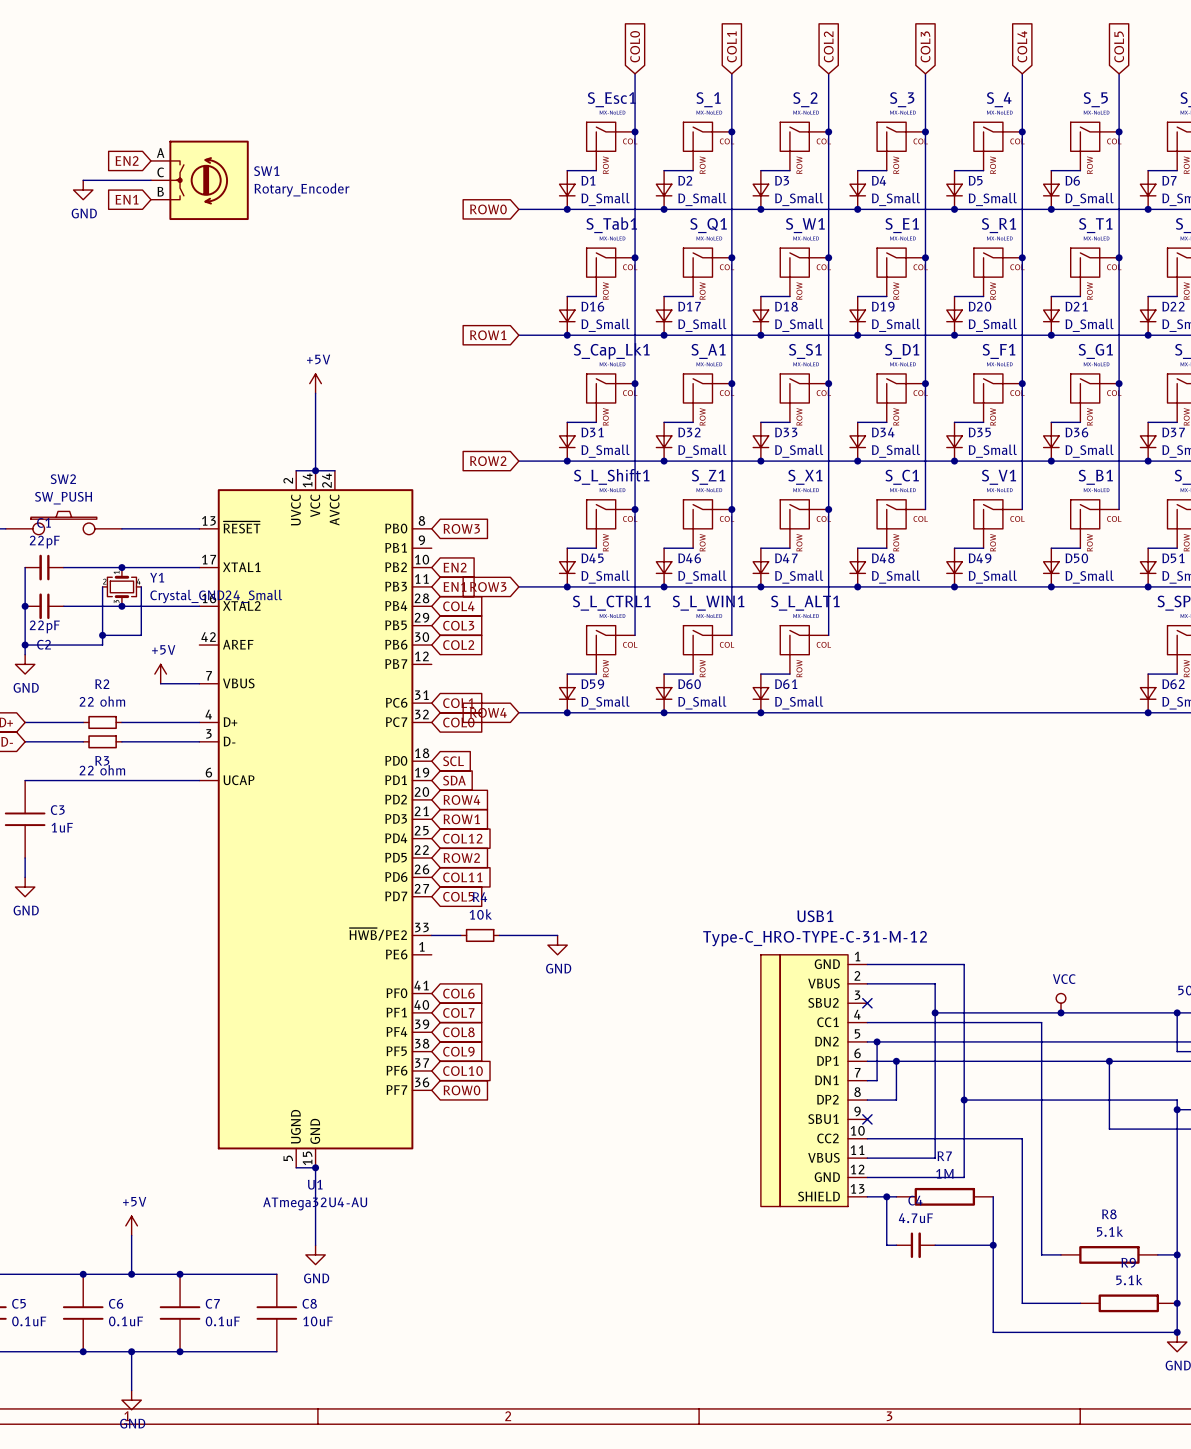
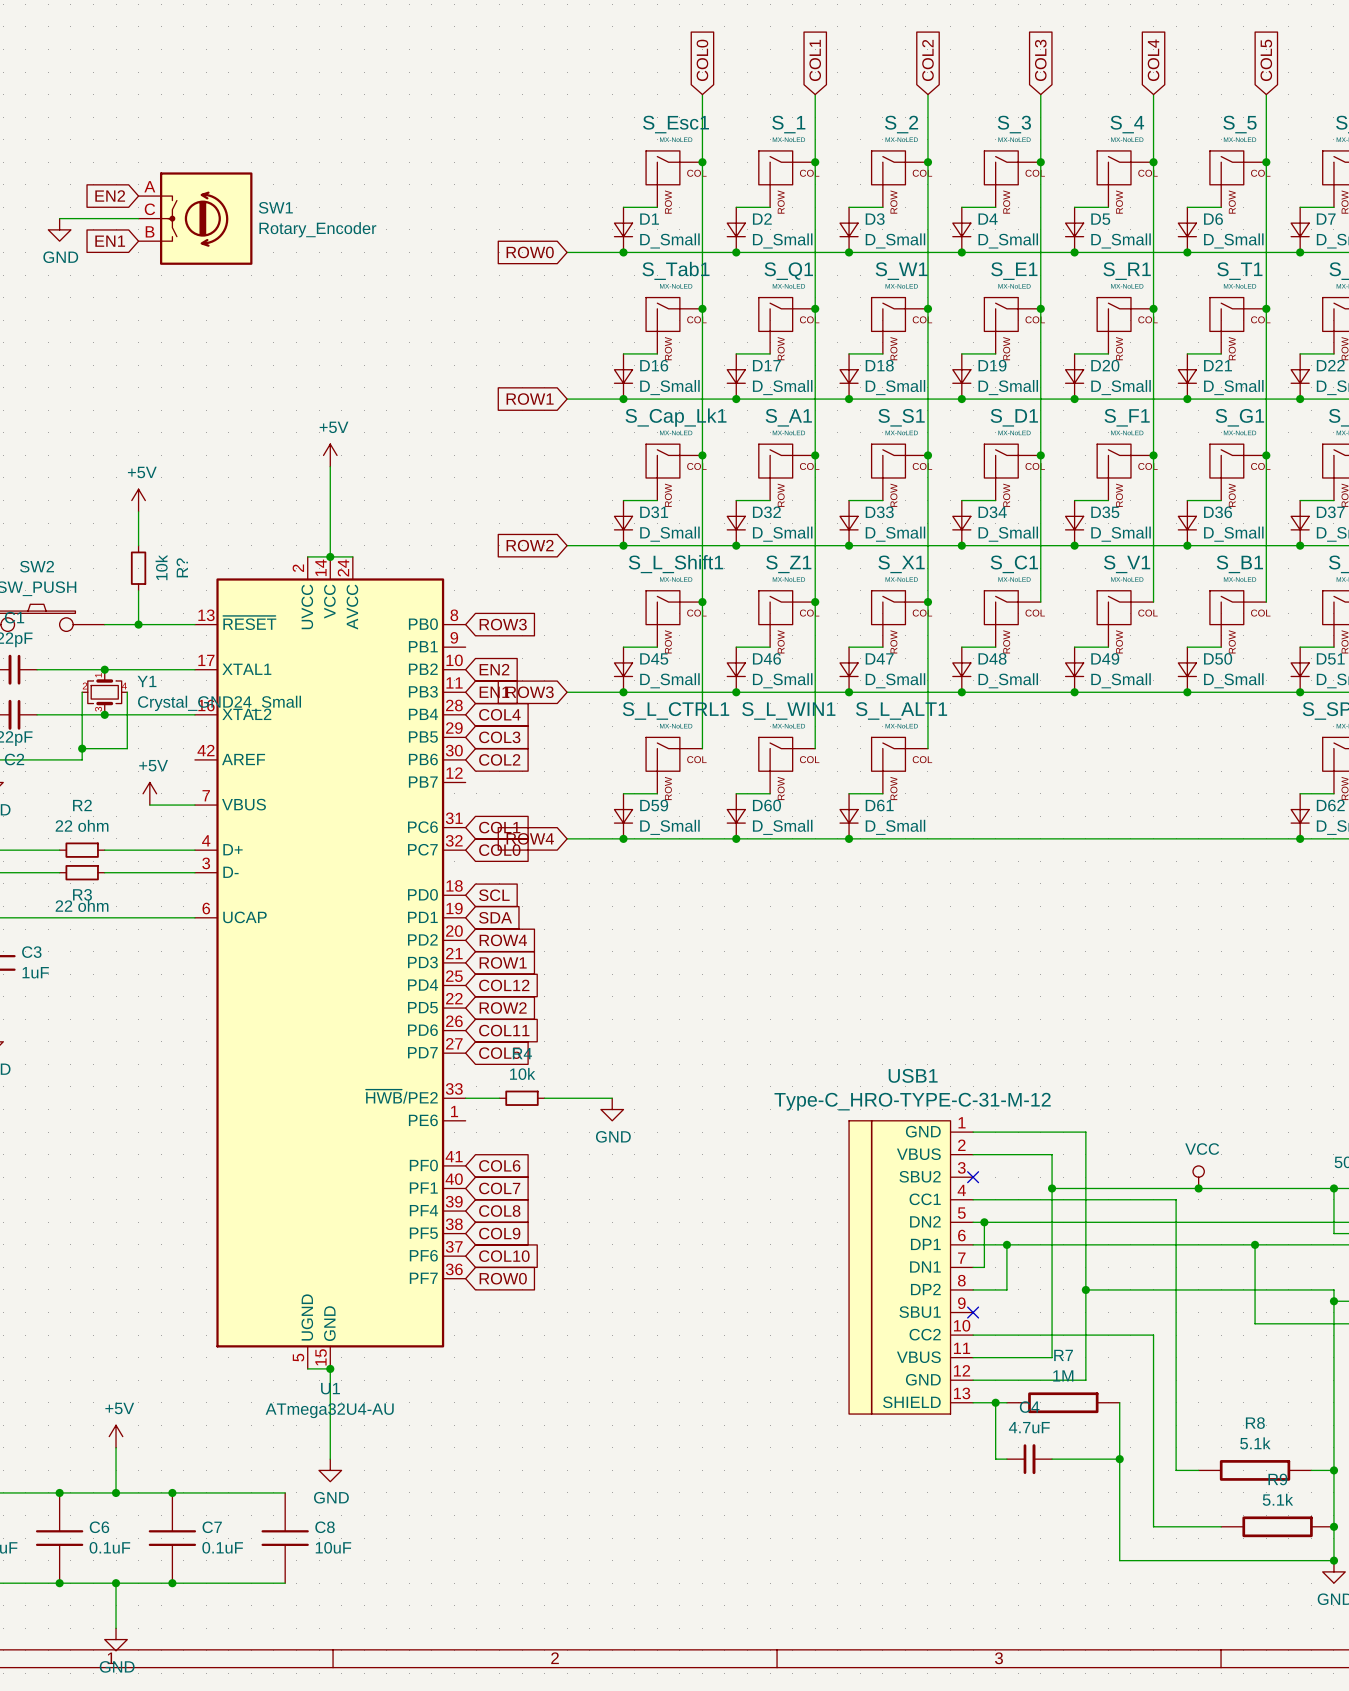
power symbol: none -> +5V (138, 500)
wire: none -> (138, 511) (138, 545)
R?: none -> 10k (138, 568)
wire: none -> (138, 590) (138, 624)
junction: none -> (138, 624)

